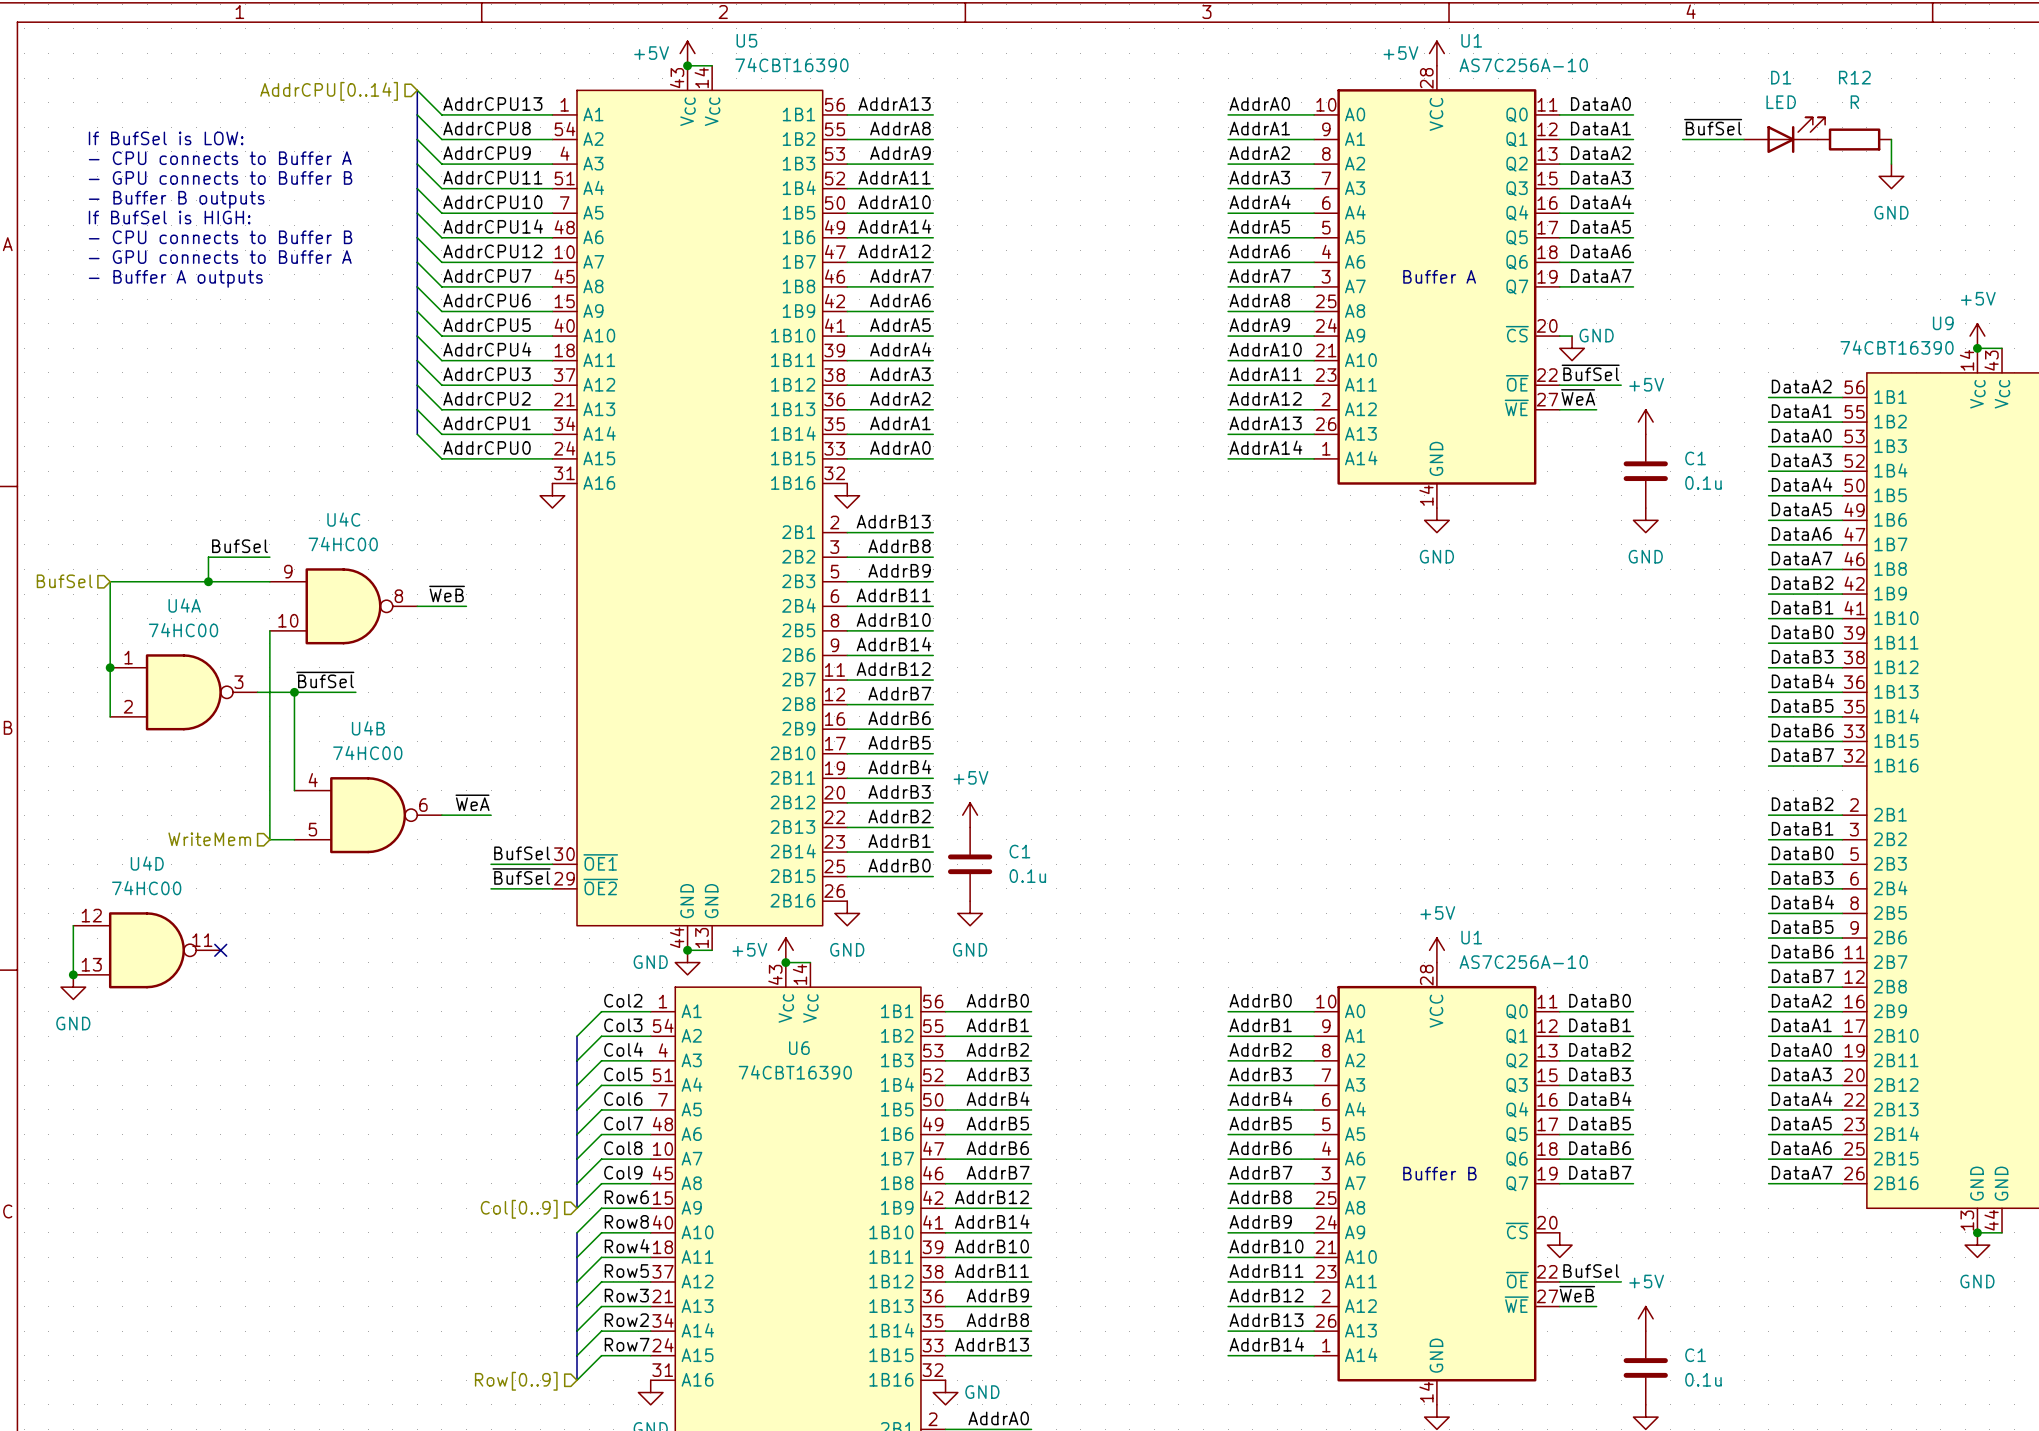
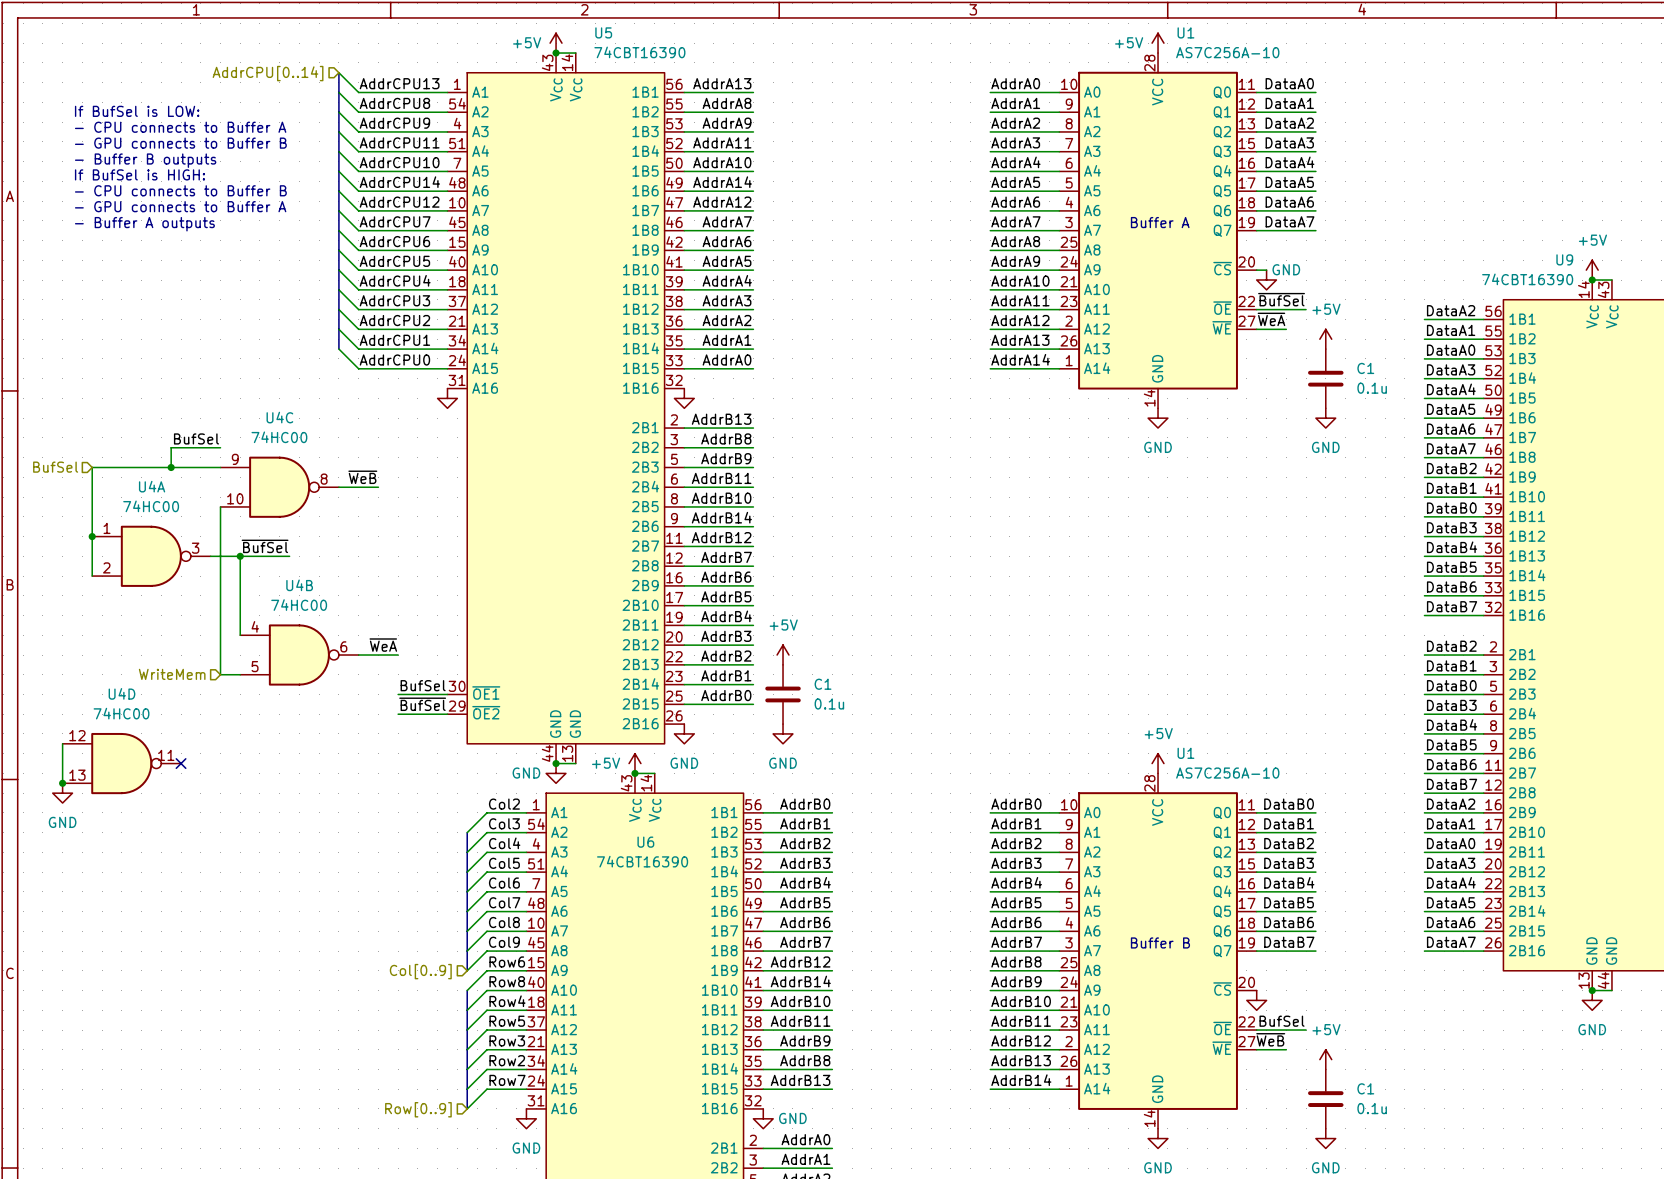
label: ~{BufSel} (1713, 127) -> none
D1: LED (1784, 135) -> none
wire: (1682, 139) (1744, 139) -> none
R12: R (1854, 139) -> none
wire: (1891, 139) (1891, 164) -> none
power symbol: GND (1891, 176) -> none

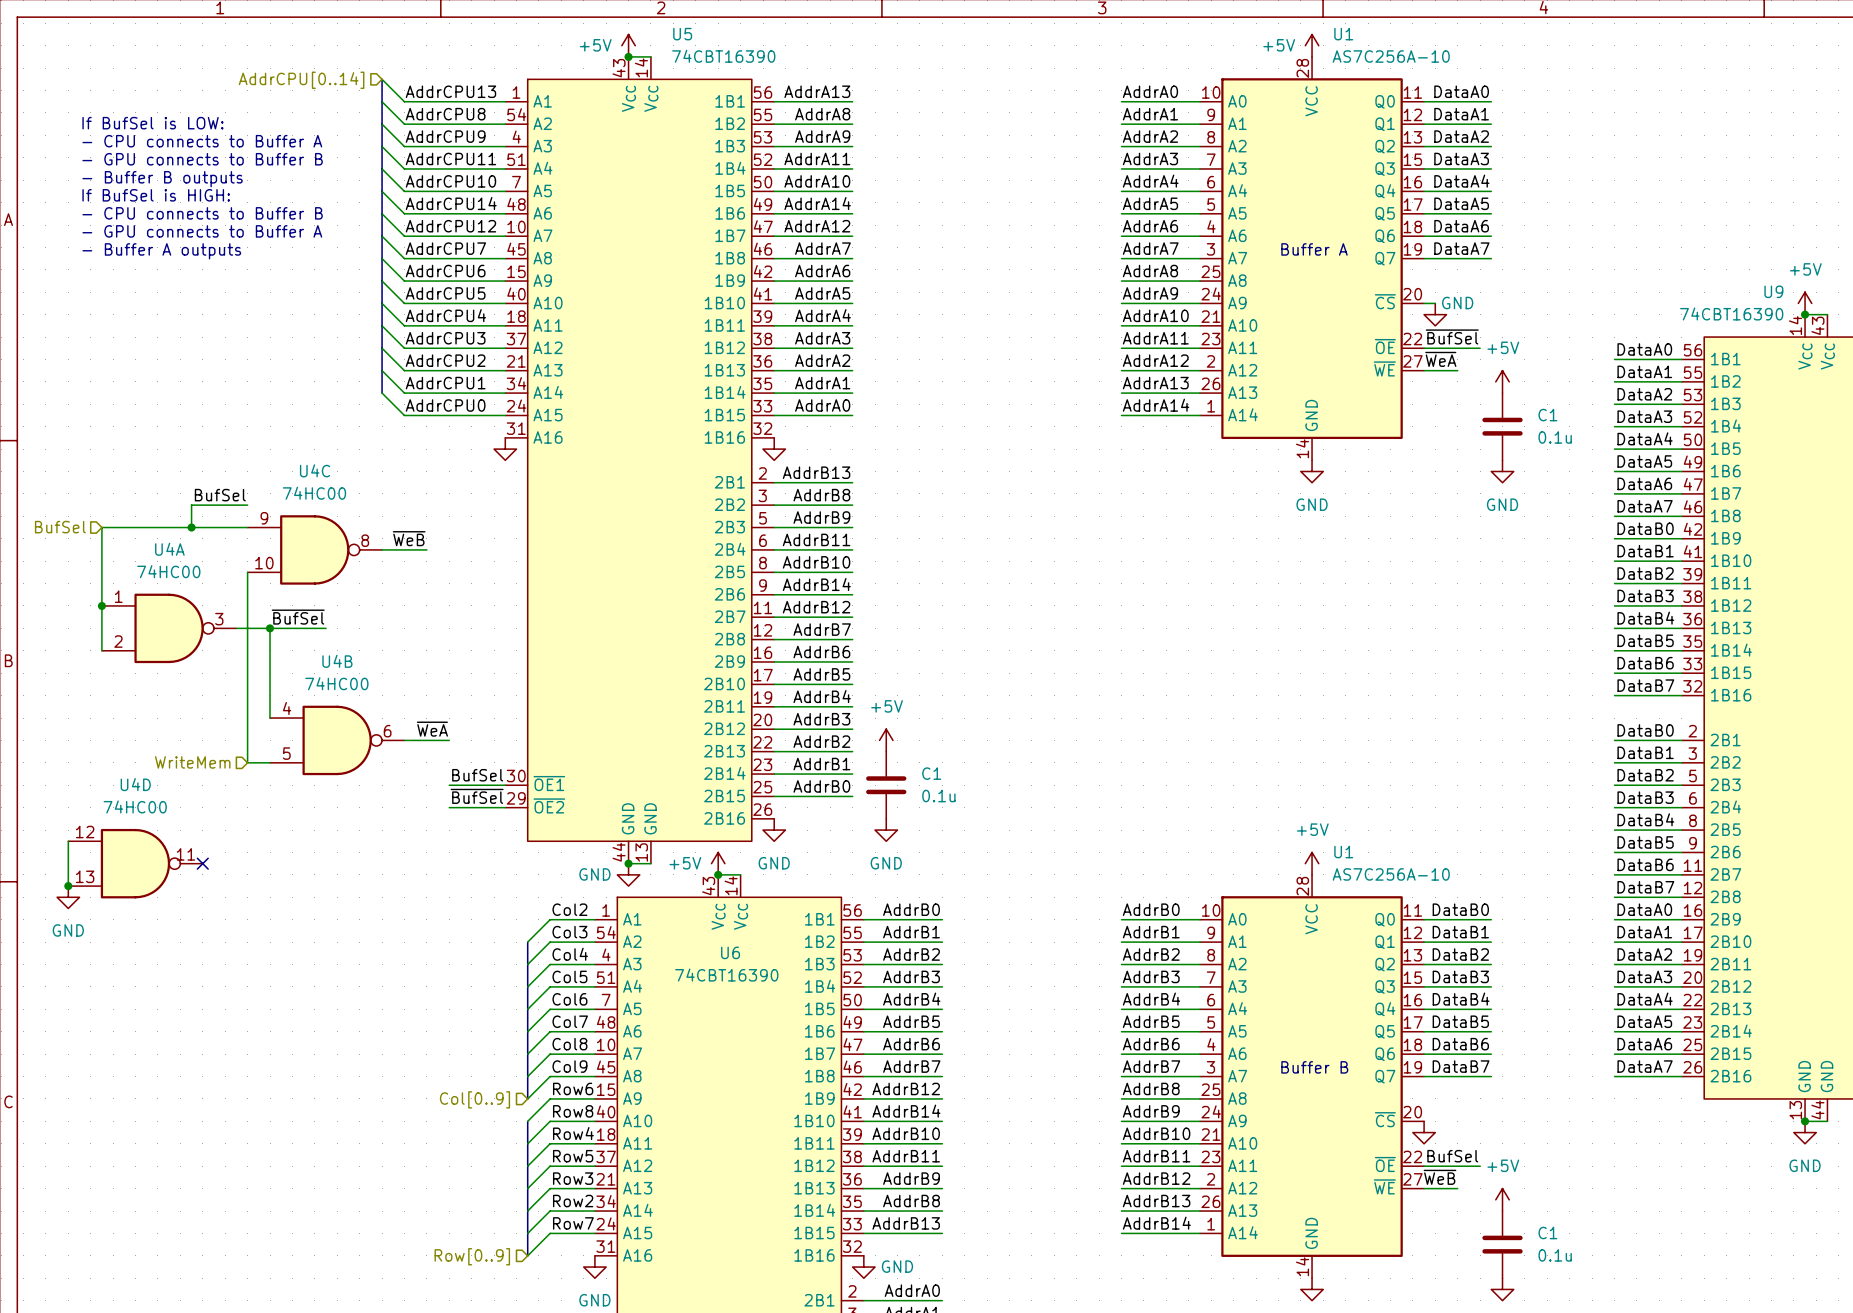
label: DataA2 (1451, 310) -> DataA0 (1644, 349)
label: DataA0 (1451, 350) -> DataA2 (1644, 394)
label: DataB2 (1451, 468) -> DataB0 (1645, 528)
label: DataB0 (1451, 508) -> DataB2 (1645, 573)
label: DataB2 (1451, 646) -> DataB0 (1645, 730)
label: DataB0 (1451, 685) -> DataB2 (1645, 775)
label: DataA2 (1451, 804) -> DataA0 (1644, 909)
label: DataA0 (1451, 843) -> DataA2 (1644, 954)

